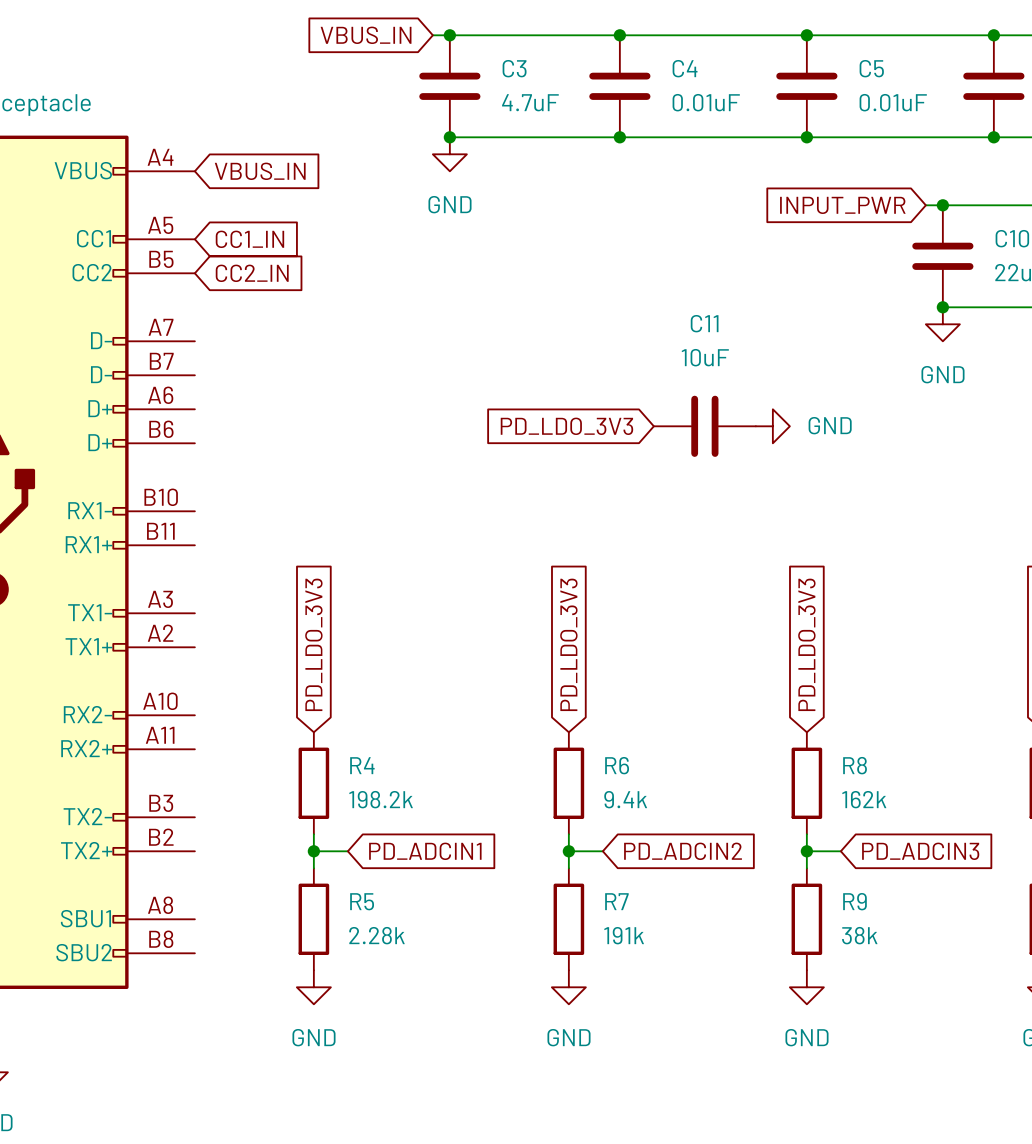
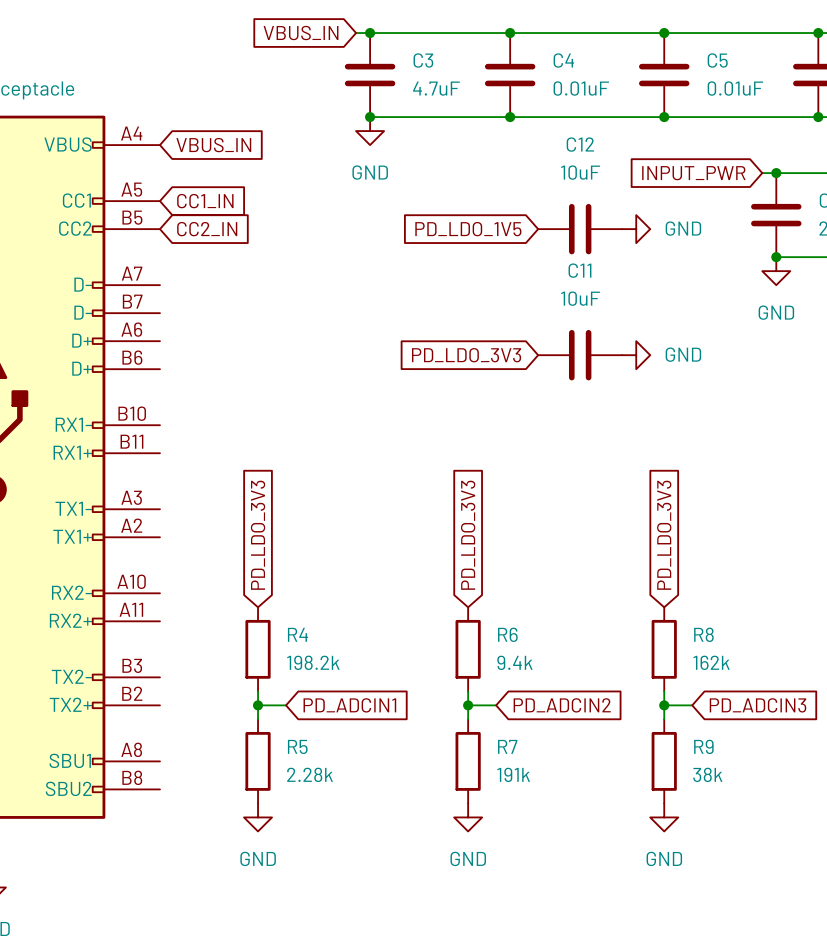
global label: none -> PD_LDO_1V5 (468, 229)
C12: none -> 10uF (580, 229)
power symbol: none -> GND (636, 229)

